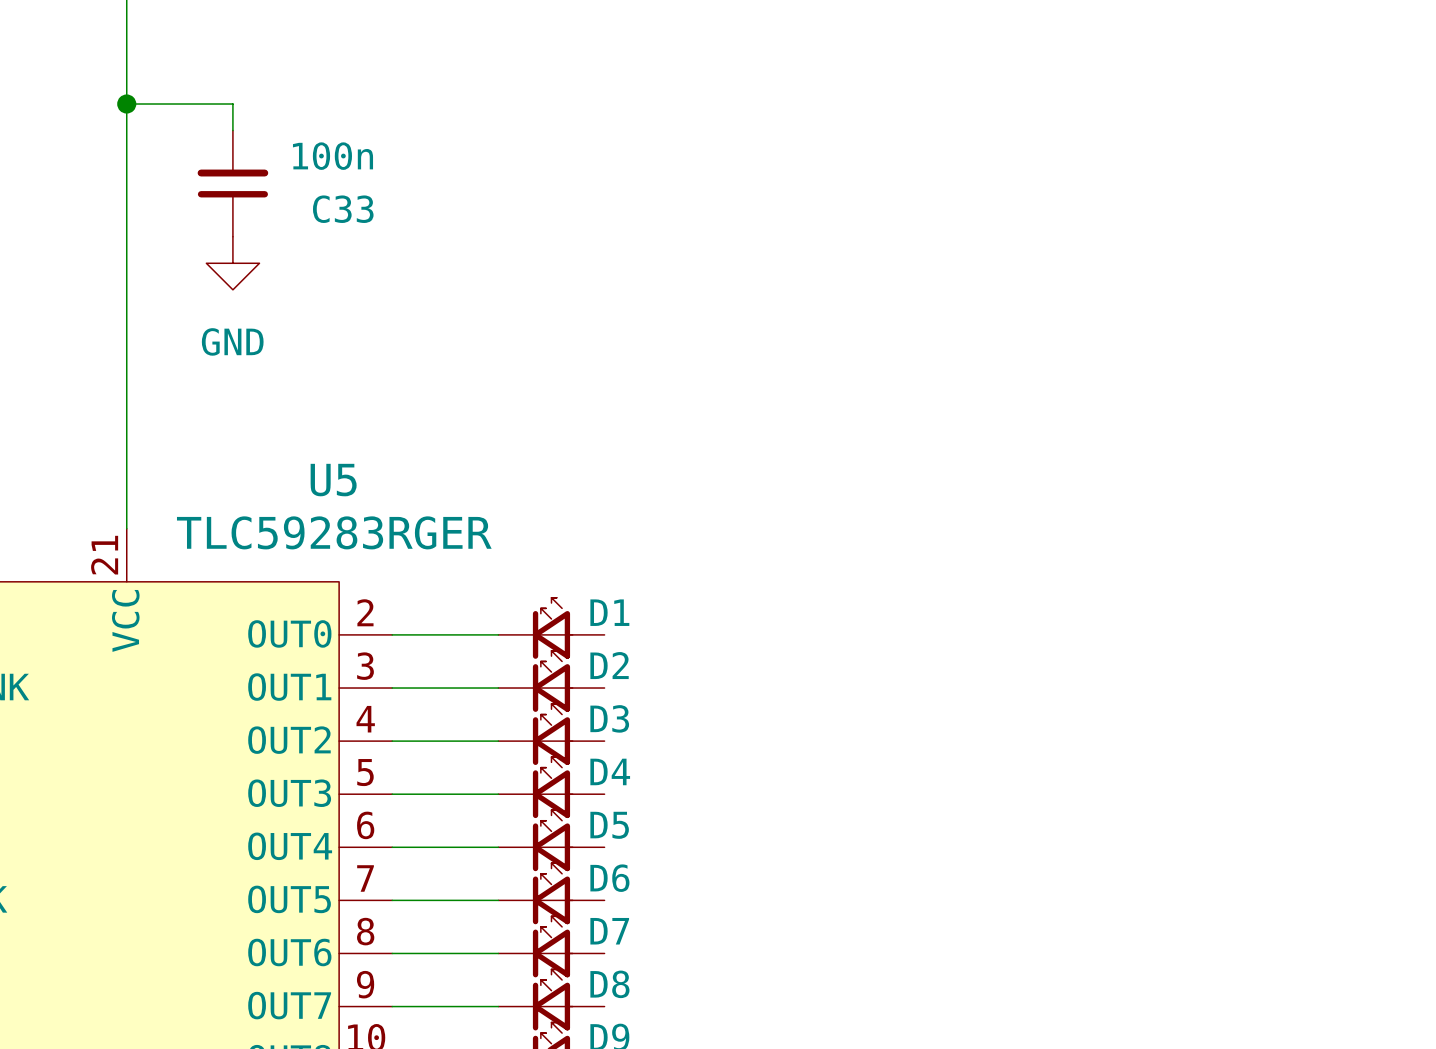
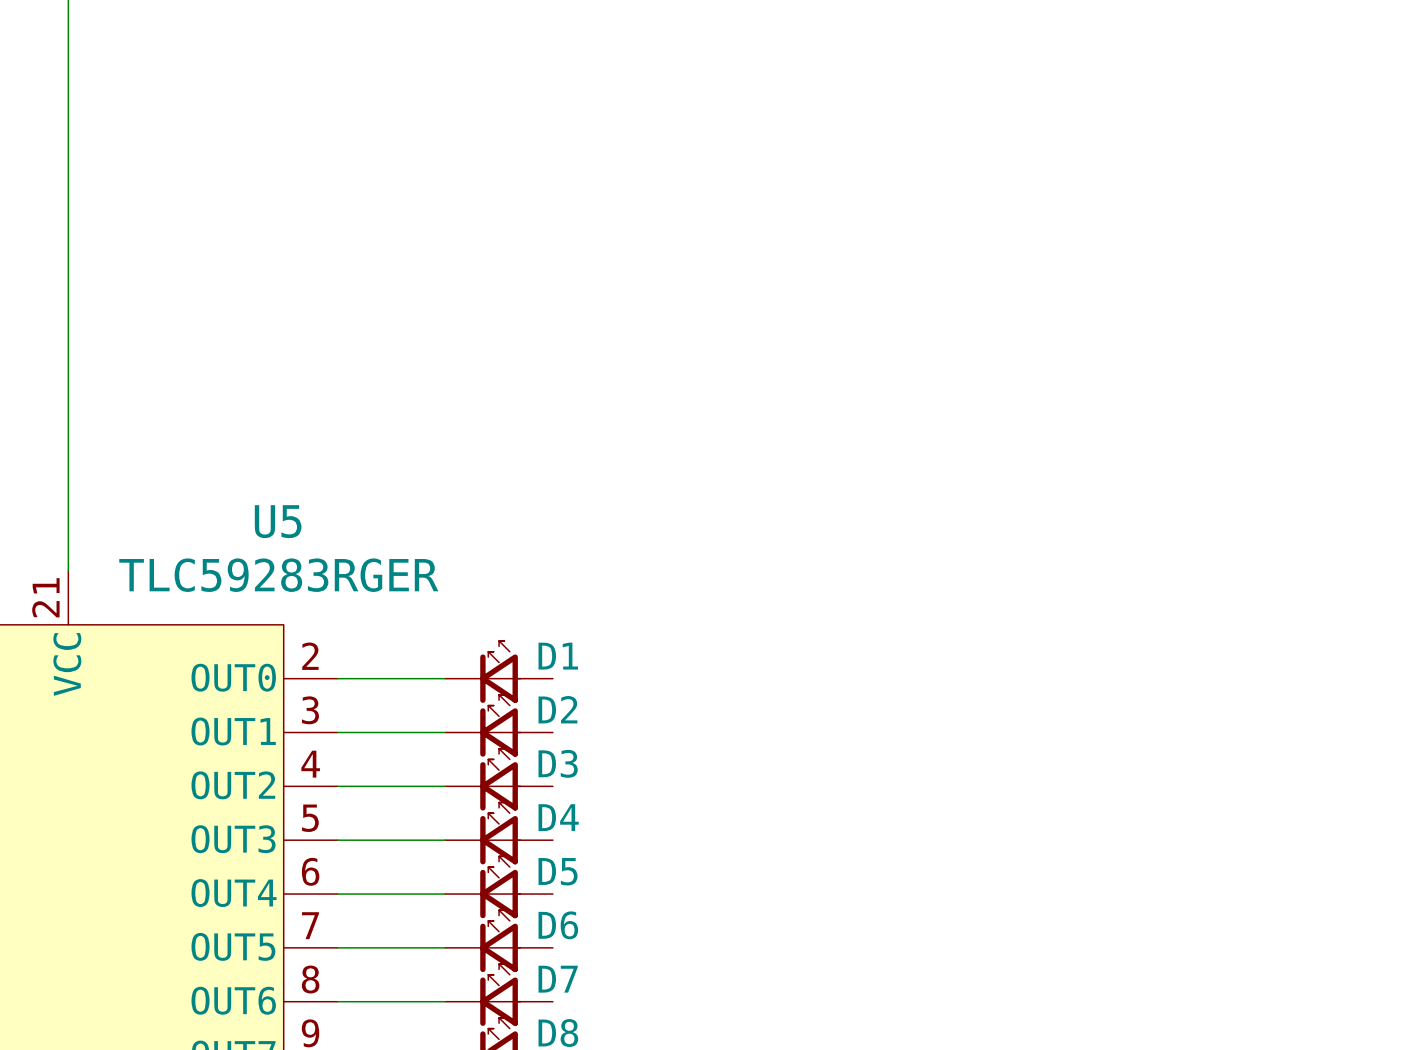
wire: (126, 104) (232, 104) (232, 130) -> none
junction: (126, 104) -> none
C33: 100n (232, 183) -> none
power symbol: GND (232, 263) -> none

